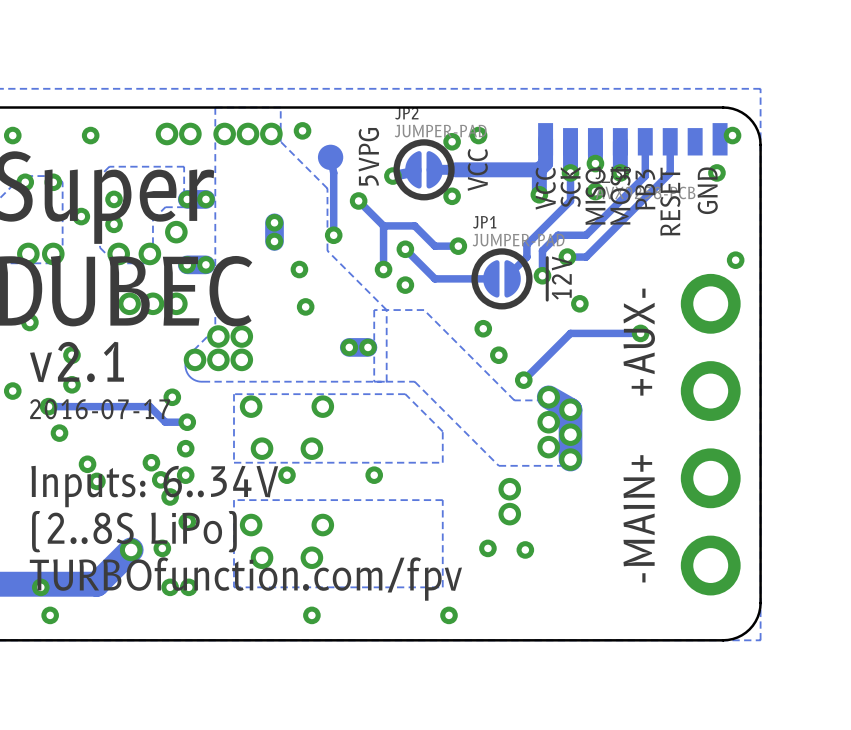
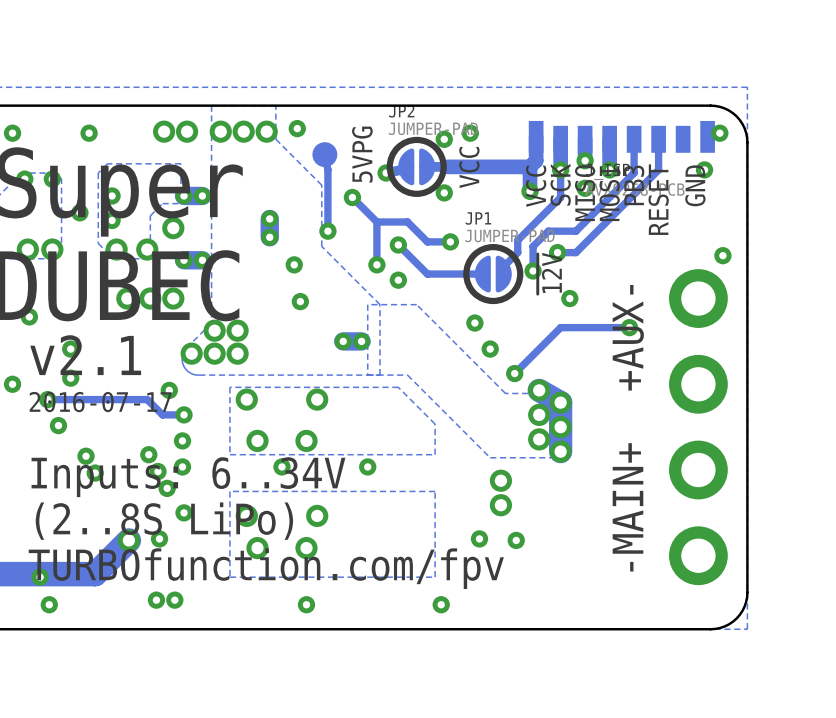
via: (170, 587) -> none
via: (188, 587) -> none
via: none -> (156, 600)
via: none -> (174, 600)

